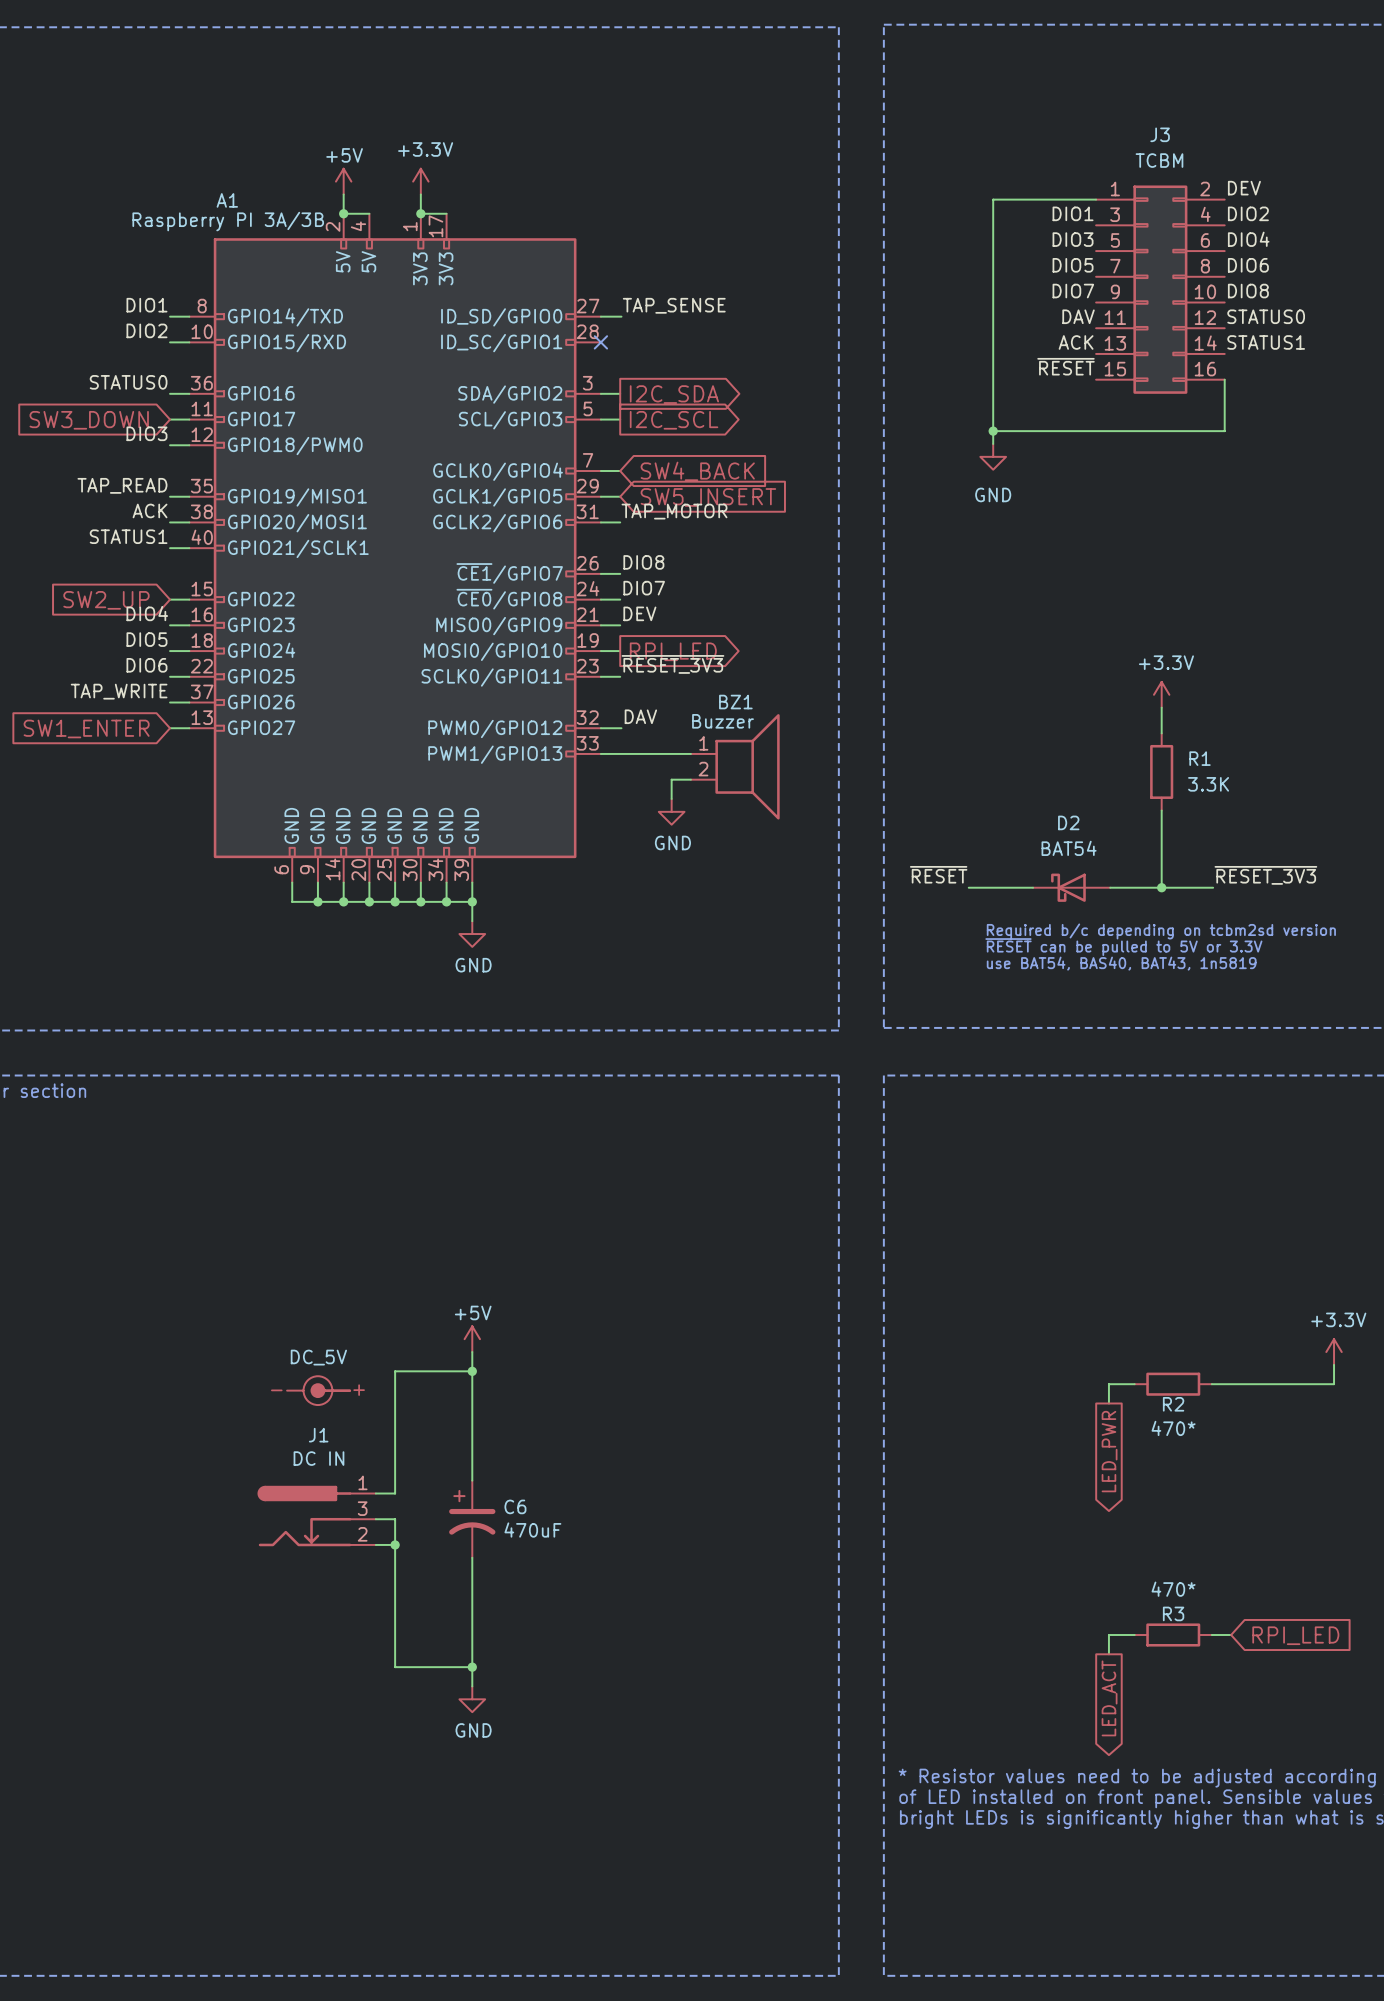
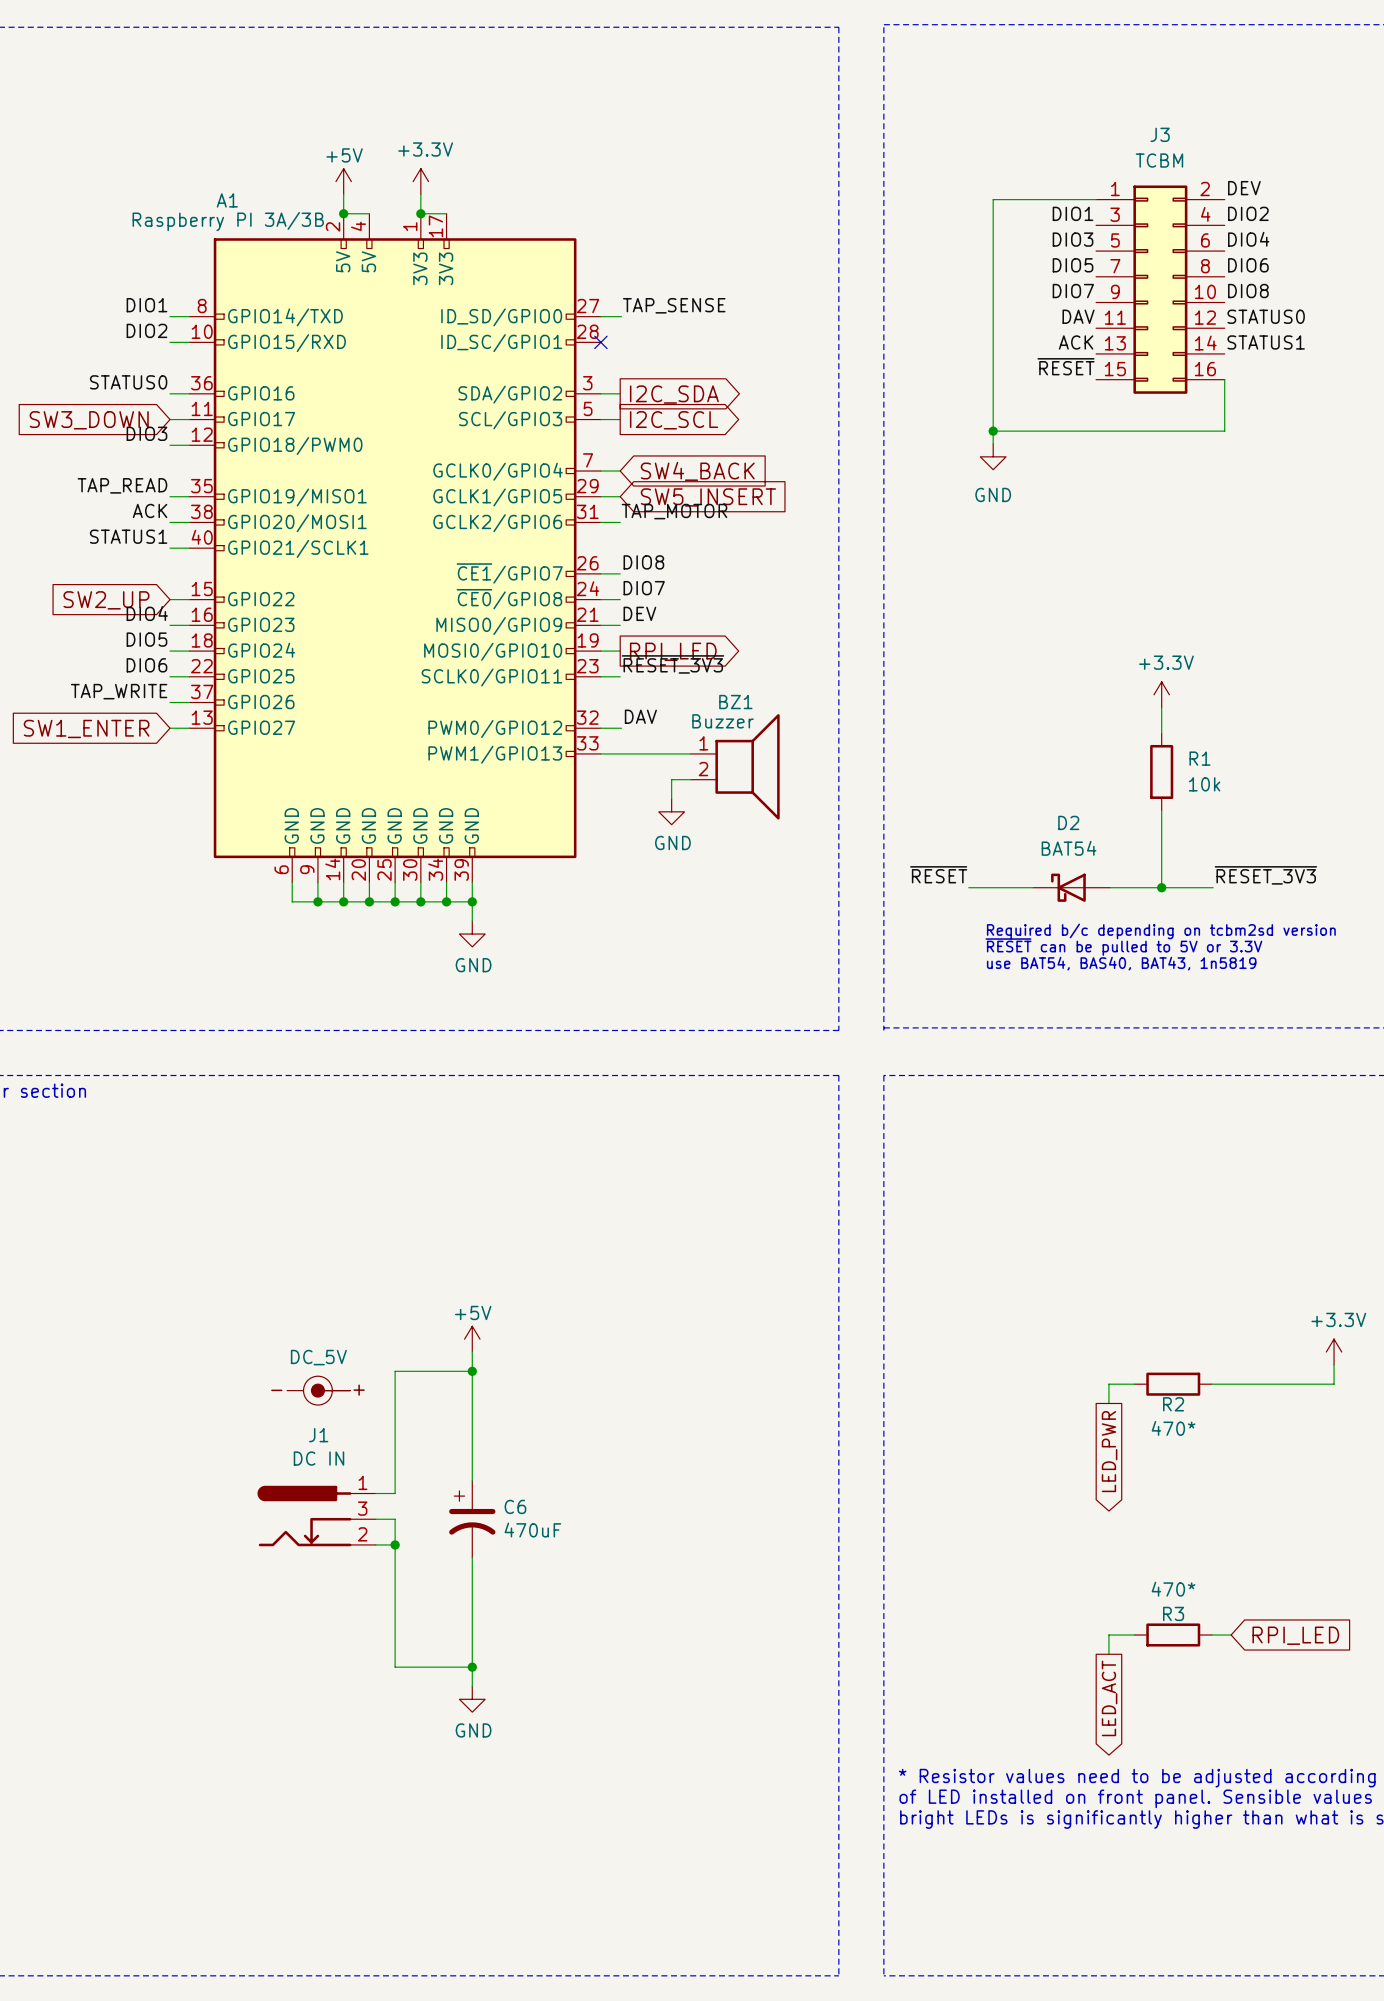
R1 value: 3.3K (1208, 784) -> 10k (1204, 784)

